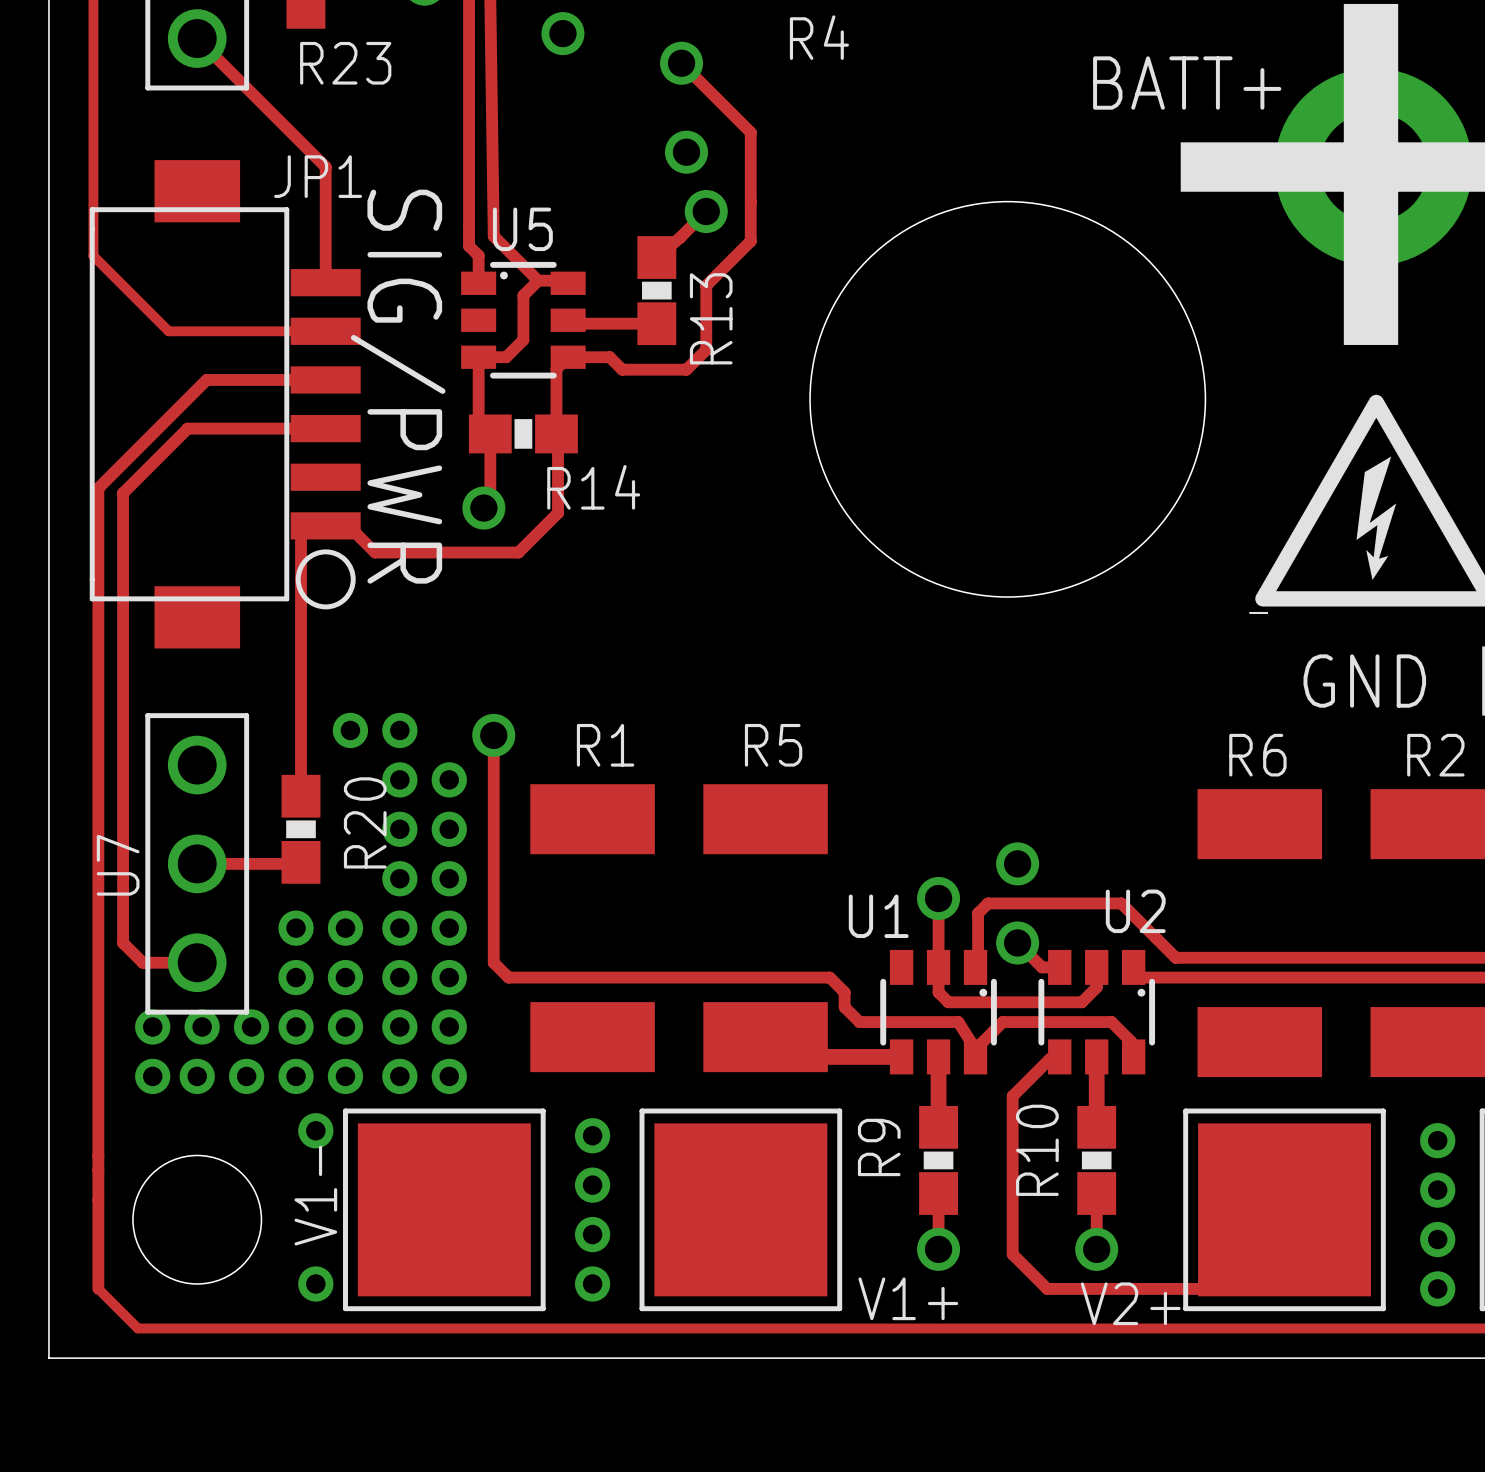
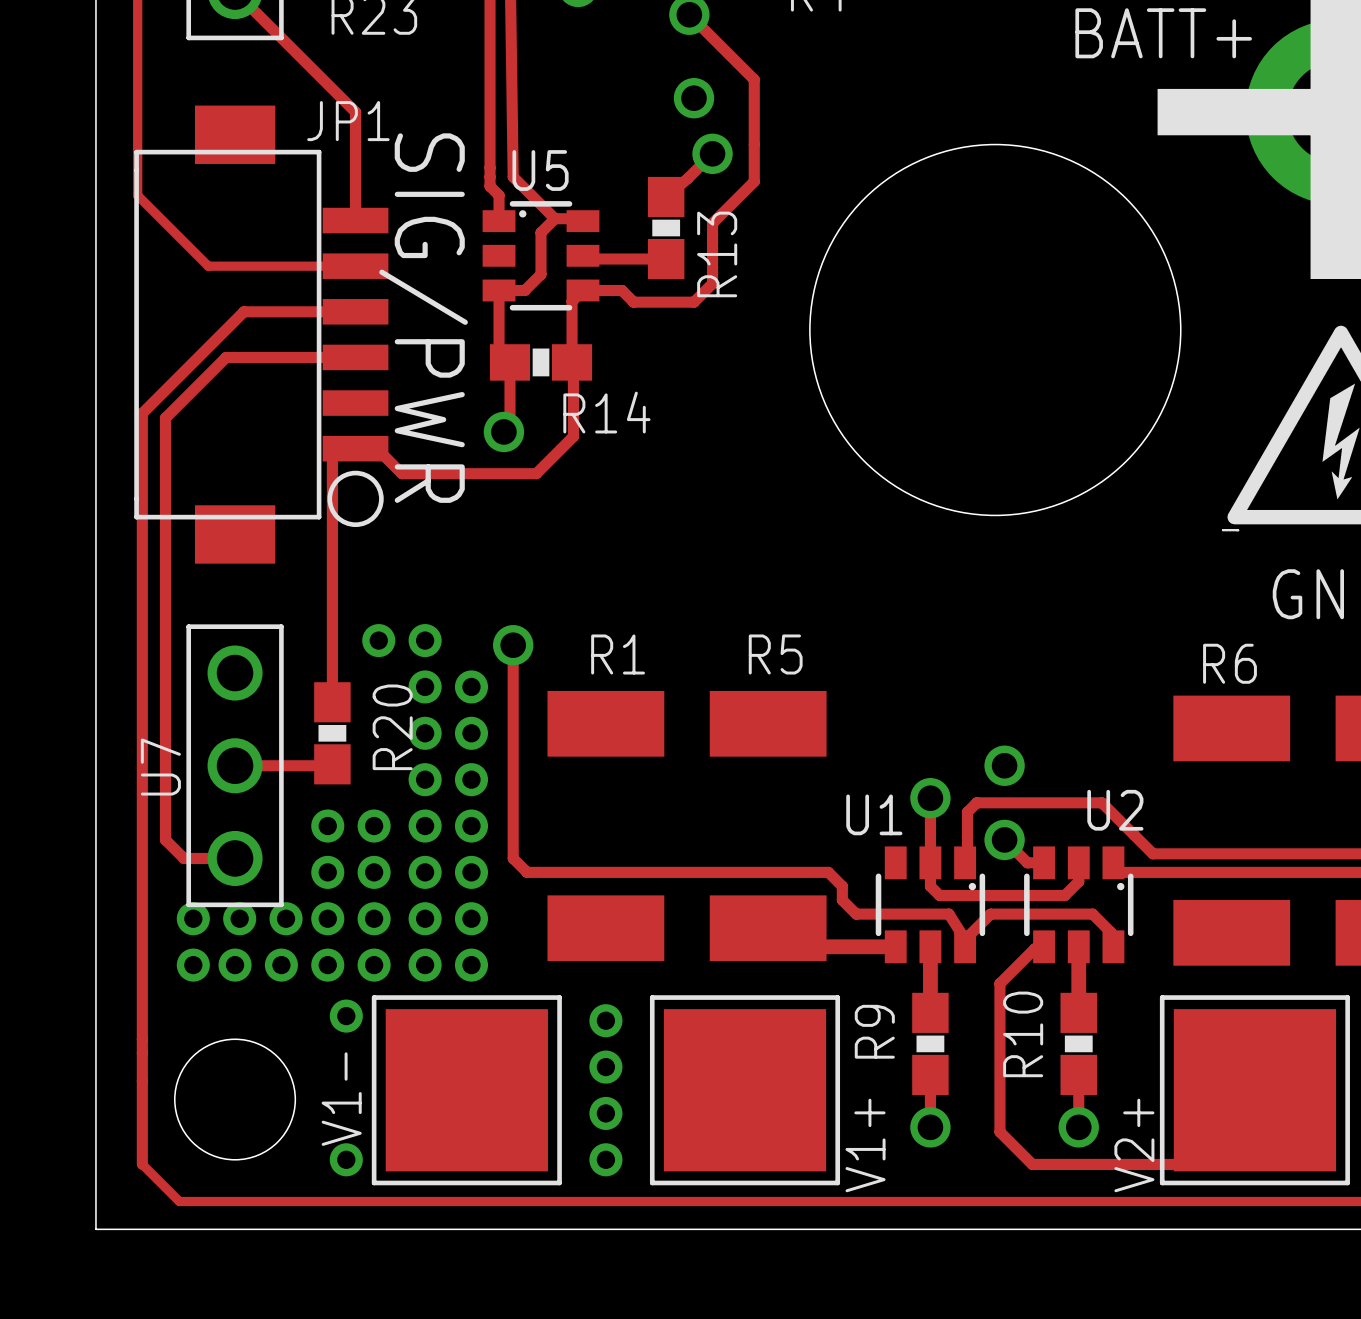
V1- name position: V1- (315, 1195) -> V1- (341, 1099)
V1+ name rotation: 0° (908, 1298) -> 90° counterclockwise (865, 1145)
V2+ name rotation: 0° (1130, 1303) -> 90° counterclockwise (1134, 1145)

